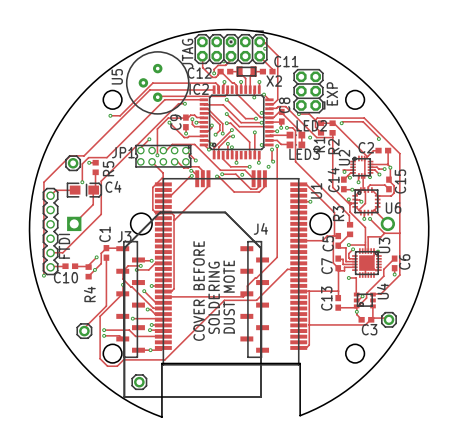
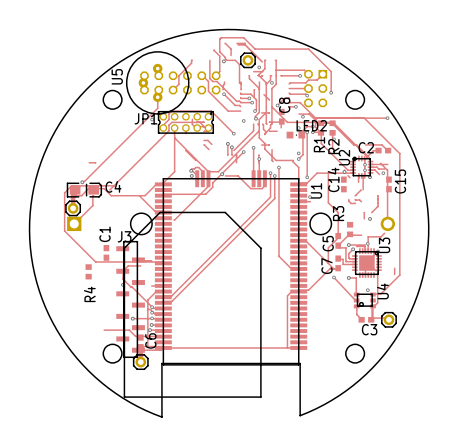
track: (259, 41) (264, 42) (277, 55) (277, 99) (273, 104) (269, 104) -> none
track: none -> (225, 43) (231, 49) (231, 55)
track: none -> (236, 43) (245, 44)
track: none -> (238, 44) (245, 44)
track: none -> (245, 44) (262, 61)
part: (231, 47) -> none
via: (265, 48) -> none
track: none -> (214, 49) (219, 56) (219, 71) (216, 75)
text: JTAG (187, 53) -> none
track: (202, 56) (202, 67) (212, 77) (215, 77) (221, 71) (236, 85) (237, 94) (260, 117) (273, 117) (281, 111) (301, 132) (301, 144) -> none
track: (231, 56) (230, 60) (225, 65) (218, 65) (214, 69) (214, 73) -> none
track: (259, 56) (272, 71) -> none
track: none -> (192, 60) (178, 75) (178, 84) (173, 90)
track: none -> (209, 60) (209, 78) (212, 81) (216, 81) (236, 101) (252, 102)
part: none -> (247, 60)
track: none -> (265, 60) (264, 68) (258, 75) (266, 82) (267, 124)
track: none -> (275, 60) (276, 84) (271, 88) (271, 123) (264, 134) (266, 132) (262, 124)
via: none -> (259, 67)
track: none -> (276, 70) (304, 70) (308, 74)
C12: (225, 71) -> none
track: (230, 71) (239, 71) (245, 78) (245, 89) -> none
X2: (246, 71) -> none
track: (253, 71) (250, 75) (250, 89) -> none
C11: (267, 71) -> none
via: (214, 73) -> none
track: none -> (322, 74) (317, 80) (289, 84)
track: none -> (201, 75) (208, 81) (208, 91) (228, 111) (240, 111)
track: none -> (249, 75) (249, 78) (259, 88) (259, 112) (255, 116)
track: none -> (262, 75) (260, 77)
track: none -> (271, 75) (266, 84)
track: none -> (280, 75) (300, 75)
via: none -> (300, 75)
via: (224, 81) -> none
via: (241, 81) -> none
via: (259, 81) -> none
part: none -> (180, 82)
via: none -> (271, 82)
track: none -> (240, 84) (239, 64) (235, 60) (226, 60) (219, 51) (221, 37) (243, 37) (255, 49) (308, 49) (331, 71) (331, 92)
track: none -> (289, 88) (308, 88)
part: none -> (315, 88)
track: (214, 89) (149, 90) (84, 155) (70, 155) (43, 182) (43, 275) -> none
track: (218, 89) (215, 83) (152, 83) (120, 115) (110, 115) -> none
track: (227, 89) (225, 96) (157, 97) -> none
track: none -> (158, 90) (157, 108) (84, 181)
part: (309, 91) -> none
via: none -> (331, 92)
track: none -> (240, 93) (250, 94) (256, 99) (255, 111)
track: none -> (289, 93) (307, 95)
text: EXP (332, 93) -> none
track: none -> (224, 94) (235, 105) (240, 106)
via: none -> (224, 94)
via: (264, 94) -> none
via: none -> (307, 95)
track: none -> (240, 97) (249, 98)
via: (254, 97) -> none
track: none -> (289, 97) (284, 98) (277, 105)
via: none -> (249, 98)
track: (203, 99) (164, 99) (106, 157) (88, 157) (82, 163) (82, 182) -> none
track: (226, 99) (245, 118) (255, 118) -> none
via: (226, 99) -> none
via: none -> (252, 102)
track: none -> (289, 102) (300, 102) (315, 118) (387, 118)
track: (184, 103) (178, 103) (101, 181) (101, 214) (62, 252) (50, 253) -> none
via: (184, 103) -> none
track: (203, 104) (223, 104) (241, 122) (261, 122) -> none
via: none -> (277, 105)
track: none -> (271, 106) (287, 122) (332, 122) (353, 144) (356, 144) (369, 157)
track: none -> (289, 106) (295, 106)
via: none -> (295, 106)
track: (203, 108) (207, 108) (222, 123) (222, 133) -> none
track: (269, 108) (285, 106) (316, 137) (332, 137) -> none
via: none -> (255, 111)
via: (261, 112) -> none
track: (203, 113) (208, 113) (219, 124) (219, 130) (215, 134) -> none
track: (226, 114) (239, 126) (269, 126) -> none
via: (226, 114) -> none
via: (298, 114) -> none
via: (110, 115) -> none
via: none -> (302, 116)
track: (203, 117) (190, 115) (185, 118) (168, 118) (157, 128) (157, 155) -> none
via: none -> (387, 118)
via: none -> (152, 119)
via: (192, 119) -> none
via: none -> (243, 120)
track: (169, 122) (184, 137) (203, 135) -> none
via: (169, 122) -> none
C9: (185, 122) -> none
via: (196, 122) -> none
IC2: (236, 122) -> none
via: (261, 122) -> none
track: (226, 123) (230, 123) (249, 142) (250, 155) -> none
via: (226, 123) -> none
track: (341, 123) (363, 121) (378, 139) -> none
via: (341, 123) -> none
track: none -> (253, 124) (253, 130) (233, 150)
via: (211, 125) -> none
track: none -> (312, 126) (307, 126) (302, 130) (302, 154) (298, 159)
via: none -> (312, 126)
via: (281, 127) -> none
track: (286, 127) (292, 127) (295, 130) (295, 161) (349, 215) (350, 224) -> none
via: (286, 127) -> none
track: none -> (163, 128) (171, 111) (211, 111) (233, 133)
track: none -> (174, 128) (174, 171) (163, 184) (156, 184) (145, 195) (111, 195) (104, 188) (88, 188) (81, 195) (73, 195) (73, 208)
track: none -> (208, 128) (205, 128) (200, 122) (171, 122) (169, 125) (169, 130) (109, 190)
via: none -> (298, 128)
track: (231, 130) (214, 147) (214, 155) -> none
via: (231, 130) -> none
track: none -> (259, 130) (218, 171) (208, 171) (174, 137)
via: (277, 131) -> none
track: (254, 132) (254, 155) -> none
via: (254, 132) -> none
track: none -> (307, 132) (307, 177)
via: none -> (307, 132)
via: none -> (312, 132)
track: (332, 132) (332, 187) (350, 204) -> (332, 132) (332, 149)
via: (186, 133) -> none
via: (222, 133) -> none
via: none -> (233, 133)
via: (215, 134) -> none
track: (289, 135) (269, 135) -> none
track: (233, 136) (229, 136) (218, 147) (218, 155) -> none
via: (233, 136) -> none
via: (310, 137) -> none
track: (149, 139) (141, 147) (140, 150) -> none
via: (149, 139) -> none
via: none -> (333, 139)
via: (378, 139) -> none
track: (269, 140) (277, 140) (281, 144) (289, 144) -> none
via: (211, 144) -> none
LED3: (295, 144) -> none
via: (261, 145) -> none
track: (277, 146) (277, 257) (247, 285) (247, 293) (243, 296) (163, 297) -> (270, 173) (270, 197) (171, 295) (163, 297)
via: (277, 146) -> none
via: none -> (253, 147)
via: (208, 149) -> none
via: (272, 149) -> none
track: (163, 150) (172, 144) (194, 144) (220, 170) (245, 170) (253, 178) -> (253, 147) (253, 178)
track: (388, 150) (387, 164) (390, 167) (388, 179) (394, 185) (394, 193) (391, 196) (378, 196) (371, 190) -> (388, 150) (381, 144) (365, 144)
via: none -> (243, 152)
via: none -> (298, 153)
via: (157, 155) -> none
track: (223, 155) (223, 159) (230, 166) (249, 166) -> none
JP1 position: (163, 156) -> (185, 122)
via: none -> (259, 159)
via: none -> (298, 159)
via: (195, 160) -> none
track: (152, 161) (163, 173) (163, 184) -> none
track: (174, 161) (178, 162) (183, 167) (198, 166) (202, 170) (202, 178) -> (191, 168) (198, 167) (202, 171) (202, 178)
via: (273, 161) -> none
via: (89, 162) -> none
via: (236, 162) -> none
via: (258, 162) -> none
part position: (73, 163) -> (73, 208)
via: none -> (365, 164)
via: (249, 166) -> none
via: (268, 166) -> none
R5: (95, 167) -> none
via: none -> (278, 167)
via: (390, 167) -> none
via: (384, 169) -> none
track: (342, 170) (353, 170) -> (312, 132) (321, 132) (321, 143) (348, 170) (353, 170)
via: none -> (365, 170)
track: (95, 172) (93, 204) (74, 223) -> (93, 195) (92, 205) (74, 223)
track: (353, 172) (343, 179) -> (353, 172) (317, 173) (307, 183) (298, 183)
via: none -> (270, 173)
track: none -> (328, 173) (328, 202) (338, 212) (338, 238) (328, 247) (328, 263)
via: none -> (383, 173)
track: (222, 174) (235, 174) (250, 189) (256, 189) (258, 186) (259, 178) -> (259, 159) (259, 178)
via: (242, 174) -> none
via: (379, 174) -> none
track: (191, 175) (171, 195) (163, 195) -> (243, 152) (212, 183) (212, 187) (205, 194) (163, 195)
via: none -> (274, 175)
track: (217, 176) (234, 192) (259, 192) (264, 186) (264, 178) -> (225, 175) (238, 175) (250, 188) (262, 188) (264, 185) (264, 178)
via: (217, 176) -> none
track: (163, 177) (152, 187) (152, 209) (155, 212) (171, 212) (174, 215) (174, 288) (171, 291) (163, 291) -> (147, 346) (147, 300) (156, 291) (163, 291)
via: none -> (307, 177)
via: (349, 177) -> none
via: (358, 182) -> none
track: (298, 184) (306, 184) (334, 212) (334, 236) -> (298, 184) (298, 167) (293, 160) (276, 160) (264, 149) (264, 143) (259, 137) (259, 119) (266, 112)
track: (343, 189) (365, 190) (365, 203) (358, 210) -> none
via: (352, 189) -> none
track: (388, 189) (384, 185) (370, 185) (368, 190) -> none
track: (75, 190) (55, 190) (50, 195) -> none
track: none -> (139, 195) (154, 211) (163, 212)
via: none -> (310, 197)
via: (348, 199) -> none
via: (310, 201) -> none
via: (361, 201) -> none
U6: (366, 201) -> none
track: (351, 203) (349, 212) (365, 227) (365, 251) -> (356, 246) (365, 246) (365, 251)
track: (355, 206) (360, 212) -> none
track: (374, 210) (387, 223) -> (380, 163) (387, 170) (387, 223)
via: (364, 218) -> none
track: (370, 218) (384, 233) (399, 233) -> none
part: (50, 231) -> none
track: none -> (349, 235) (361, 235)
track: (333, 236) (333, 263) (338, 268) (338, 298) -> none
track: (338, 236) (327, 236) (322, 240) (298, 240) -> (333, 269) (305, 240) (298, 240)
via: none -> (367, 243)
text: FTDI (64, 246) -> none
track: (106, 248) (123, 248) -> none
track: (106, 248) (101, 253) (101, 263) (88, 276) -> none
track: (96, 257) (88, 267) (75, 266) -> none
via: (96, 257) -> none
track: (106, 257) (106, 306) (84, 327) (84, 331) -> none
track: (394, 258) (383, 269) (383, 276) (366, 293) (366, 298) (357, 307) (338, 307) -> none
via: (151, 260) -> none
track: (163, 263) (155, 263) (148, 269) (136, 269) -> (163, 263) (95, 261) (64, 230) (64, 192) (71, 185) (114, 185)
C6 position: (394, 263) -> (140, 342)
via: (140, 265) -> none
track: (65, 266) (50, 267) -> none
C10: (70, 266) -> none
track: (354, 267) (344, 267) (344, 270) (338, 270) (338, 269) -> (287, 348) (287, 295) (291, 291) (308, 290) (329, 269) (338, 269)
track: (298, 268) (287, 269) (256, 300) (224, 300) (164, 359) (123, 359) (117, 366) (107, 366) (100, 358) (100, 316) (123, 293) (123, 284) -> (298, 268) (290, 267) (278, 256) (278, 167)
via: (94, 269) -> none
via: (136, 269) -> none
track: none -> (377, 270) (377, 302) (372, 307) (372, 319)
via: (394, 274) -> none
via: (43, 275) -> none
via: none -> (333, 277)
via: (151, 285) -> none
text: COVER BEFORE (199, 290) -> none
via: none -> (367, 290)
track: (144, 291) (155, 302) (163, 302) -> (274, 175) (274, 198) (171, 301) (163, 302)
via: (144, 291) -> none
track: (309, 291) (309, 345) (306, 347) (298, 347) -> (140, 362) (140, 346) (298, 348)
track: (338, 291) (298, 291) -> none
track: (362, 296) (356, 300) -> (333, 277) (356, 300)
via: (362, 296) -> none
text: SOLDERING (214, 297) -> none
text: DUST MOTE (229, 297) -> none
C13: (338, 302) -> none
J4: (196, 304) -> none
via: none -> (152, 307)
via: (147, 309) -> none
via: (356, 311) -> none
via: none -> (152, 312)
via: none -> (152, 318)
track: (371, 319) (365, 324) (309, 324) -> none
via: (104, 330) -> none
part: (84, 331) -> none
track: (104, 335) (119, 335) (122, 338) -> none
via: (104, 335) -> none
via: (150, 350) -> none
part position: (139, 382) -> (140, 362)

